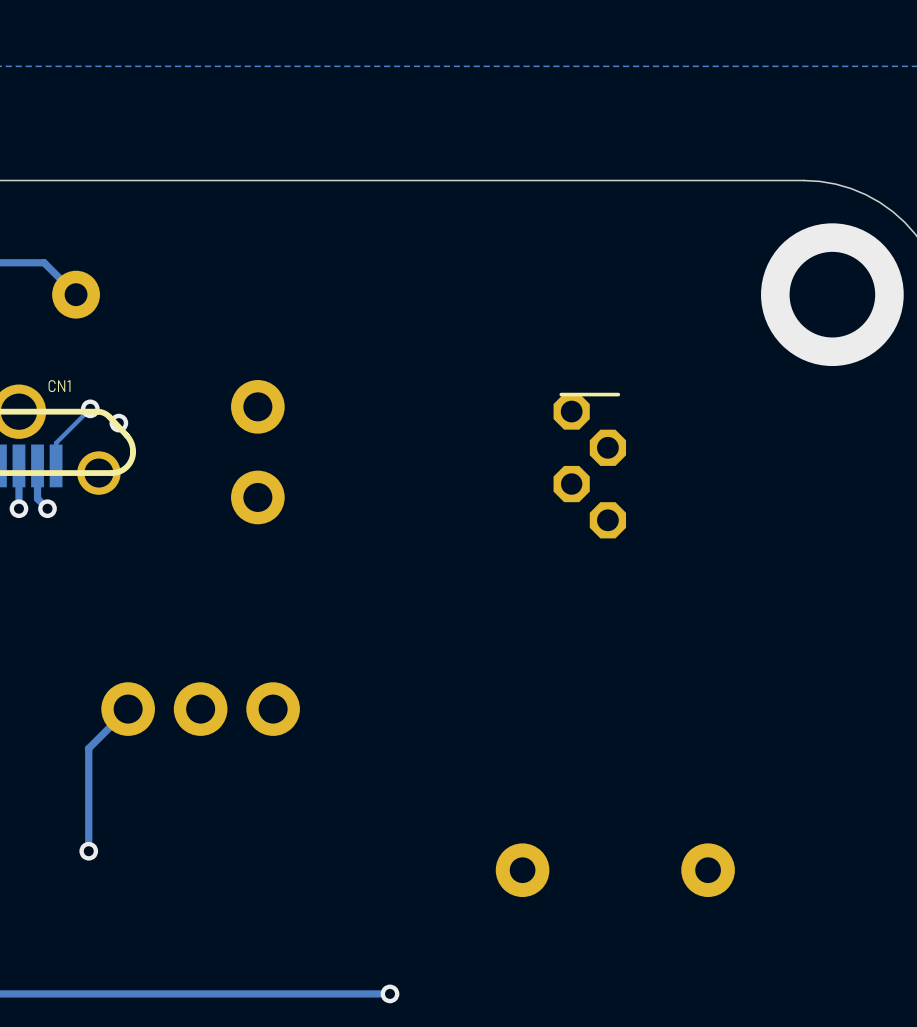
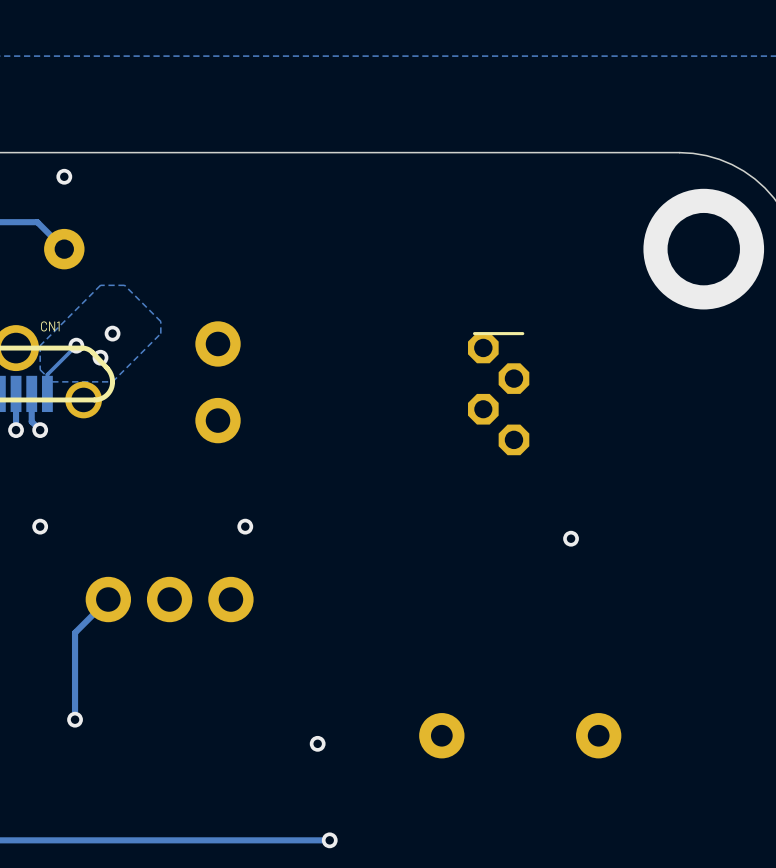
via: none -> (64, 176)
zone outline: none -> (124, 285) (160, 321) (160, 333) (112, 381) (52, 381) (40, 369) (40, 345) (100, 285) (124, 285)
via: none -> (112, 333)
via: none -> (40, 526)
via: none -> (245, 526)
via: none -> (571, 538)
via: none -> (317, 743)

